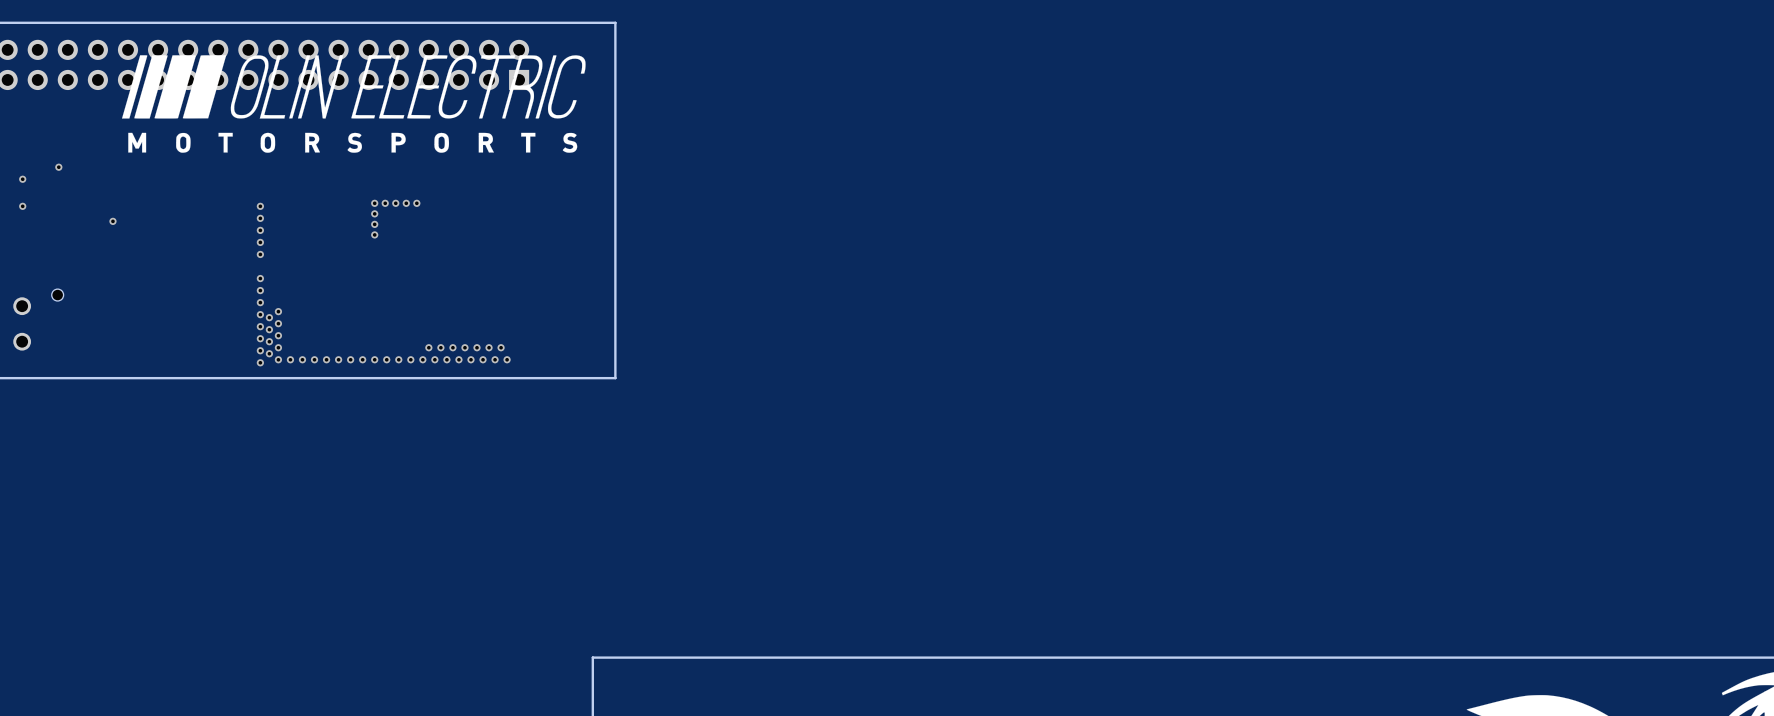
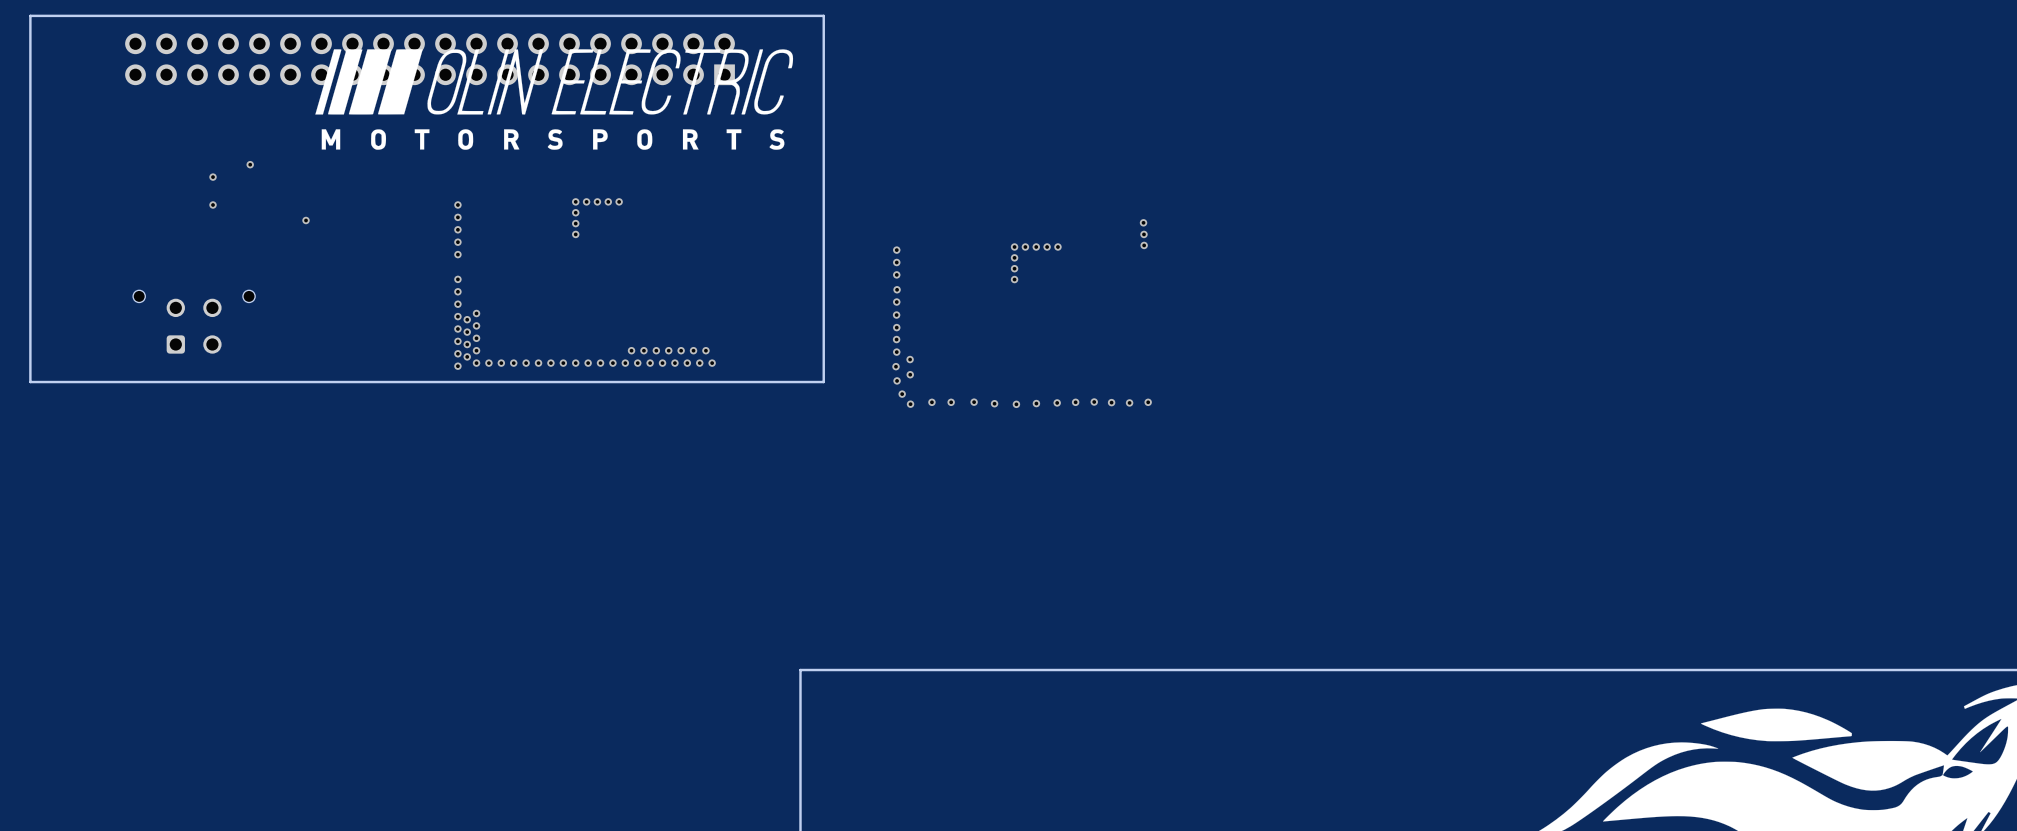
via: none -> (1143, 222)
via: none -> (1143, 234)
via: none -> (1144, 245)
via: none -> (1014, 246)
via: none -> (1025, 246)
via: none -> (1036, 246)
via: none -> (1047, 246)
via: none -> (1057, 246)
via: none -> (896, 250)
via: none -> (1014, 257)
via: none -> (896, 262)
via: none -> (1014, 268)
via: none -> (896, 274)
via: none -> (1014, 279)
via: none -> (897, 289)
via: none -> (896, 302)
via: none -> (896, 315)
via: none -> (896, 327)
via: none -> (896, 339)
via: none -> (896, 352)
via: none -> (910, 359)
via: none -> (895, 366)
via: none -> (910, 374)
via: none -> (897, 380)
via: none -> (902, 394)
via: none -> (931, 402)
via: none -> (951, 402)
via: none -> (974, 402)
via: none -> (1075, 402)
via: none -> (1094, 402)
via: none -> (1148, 402)
via: none -> (1057, 402)
via: none -> (1111, 402)
via: none -> (1129, 402)
via: none -> (910, 404)
via: none -> (994, 403)
via: none -> (1016, 404)
via: none -> (1036, 403)

